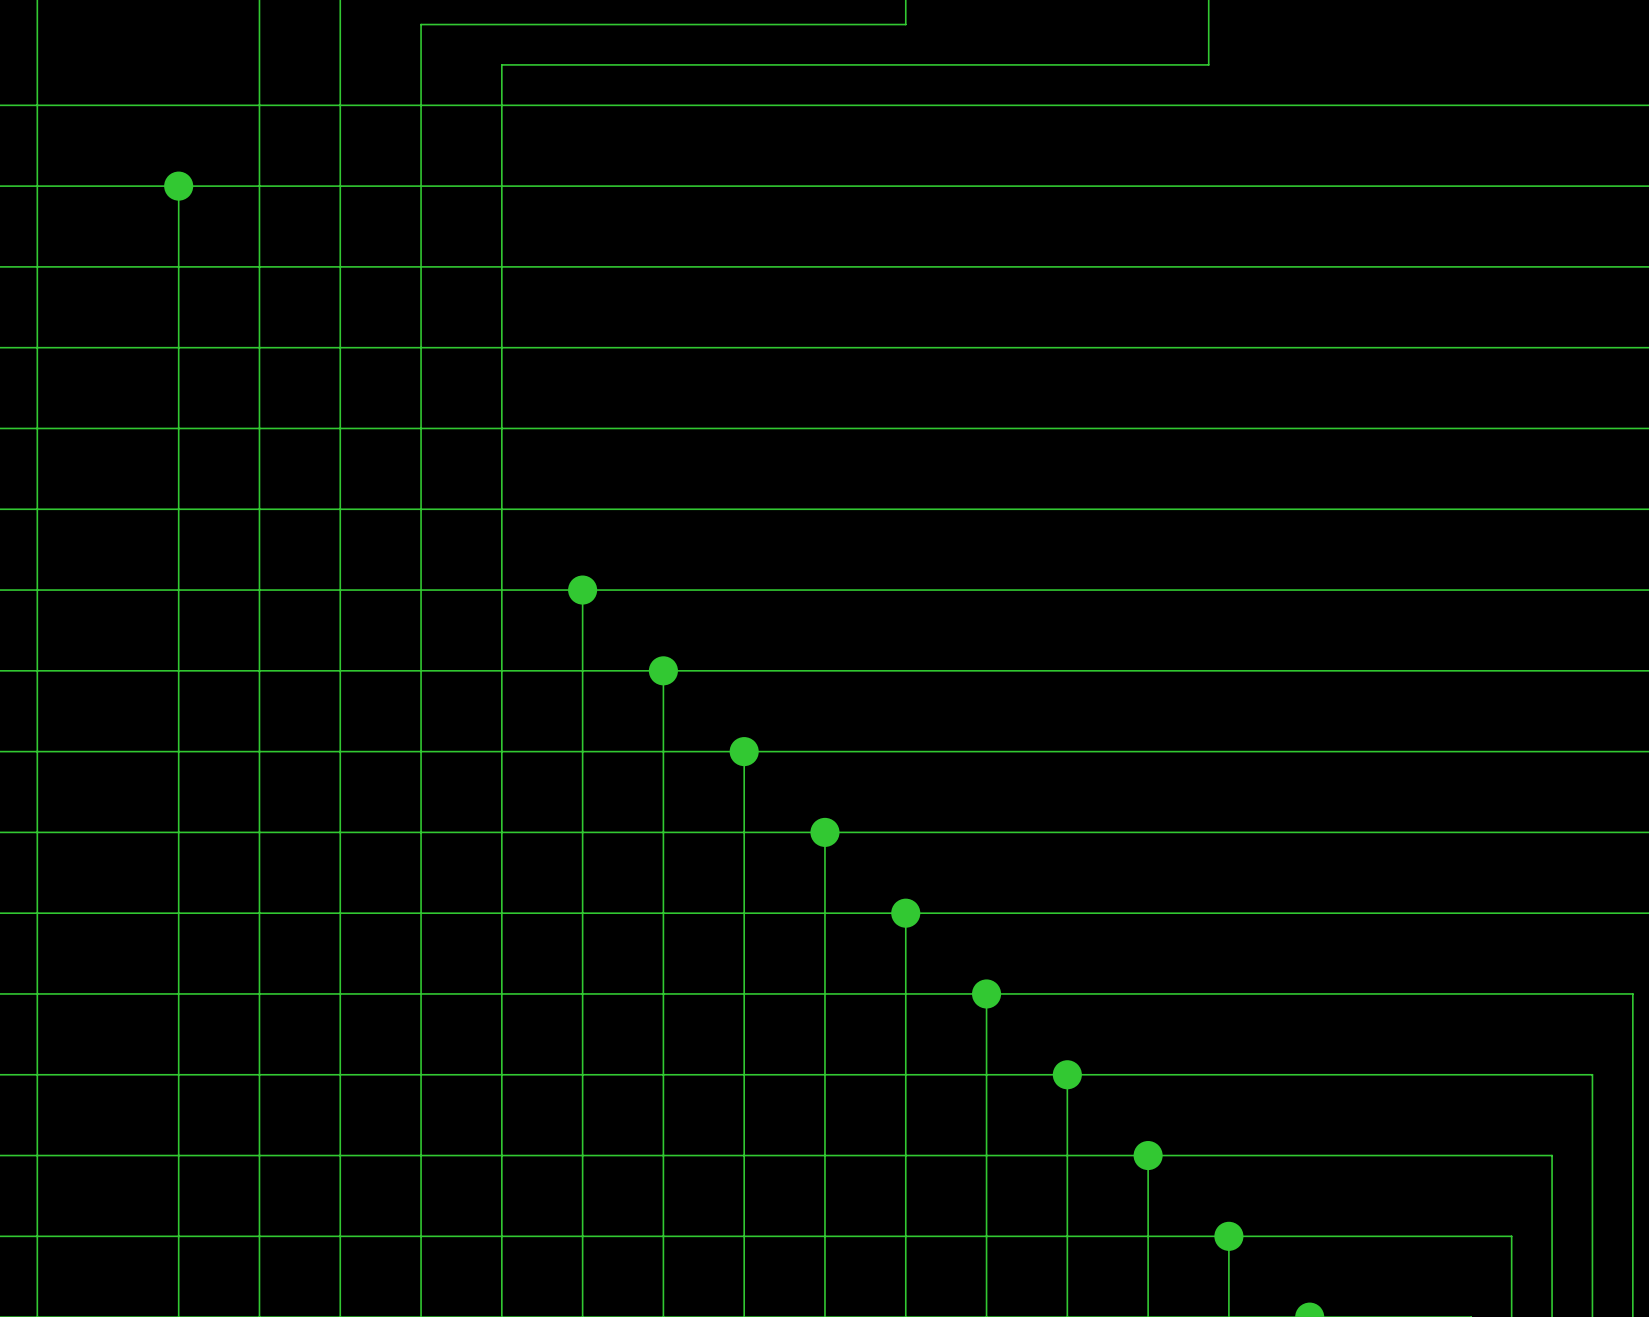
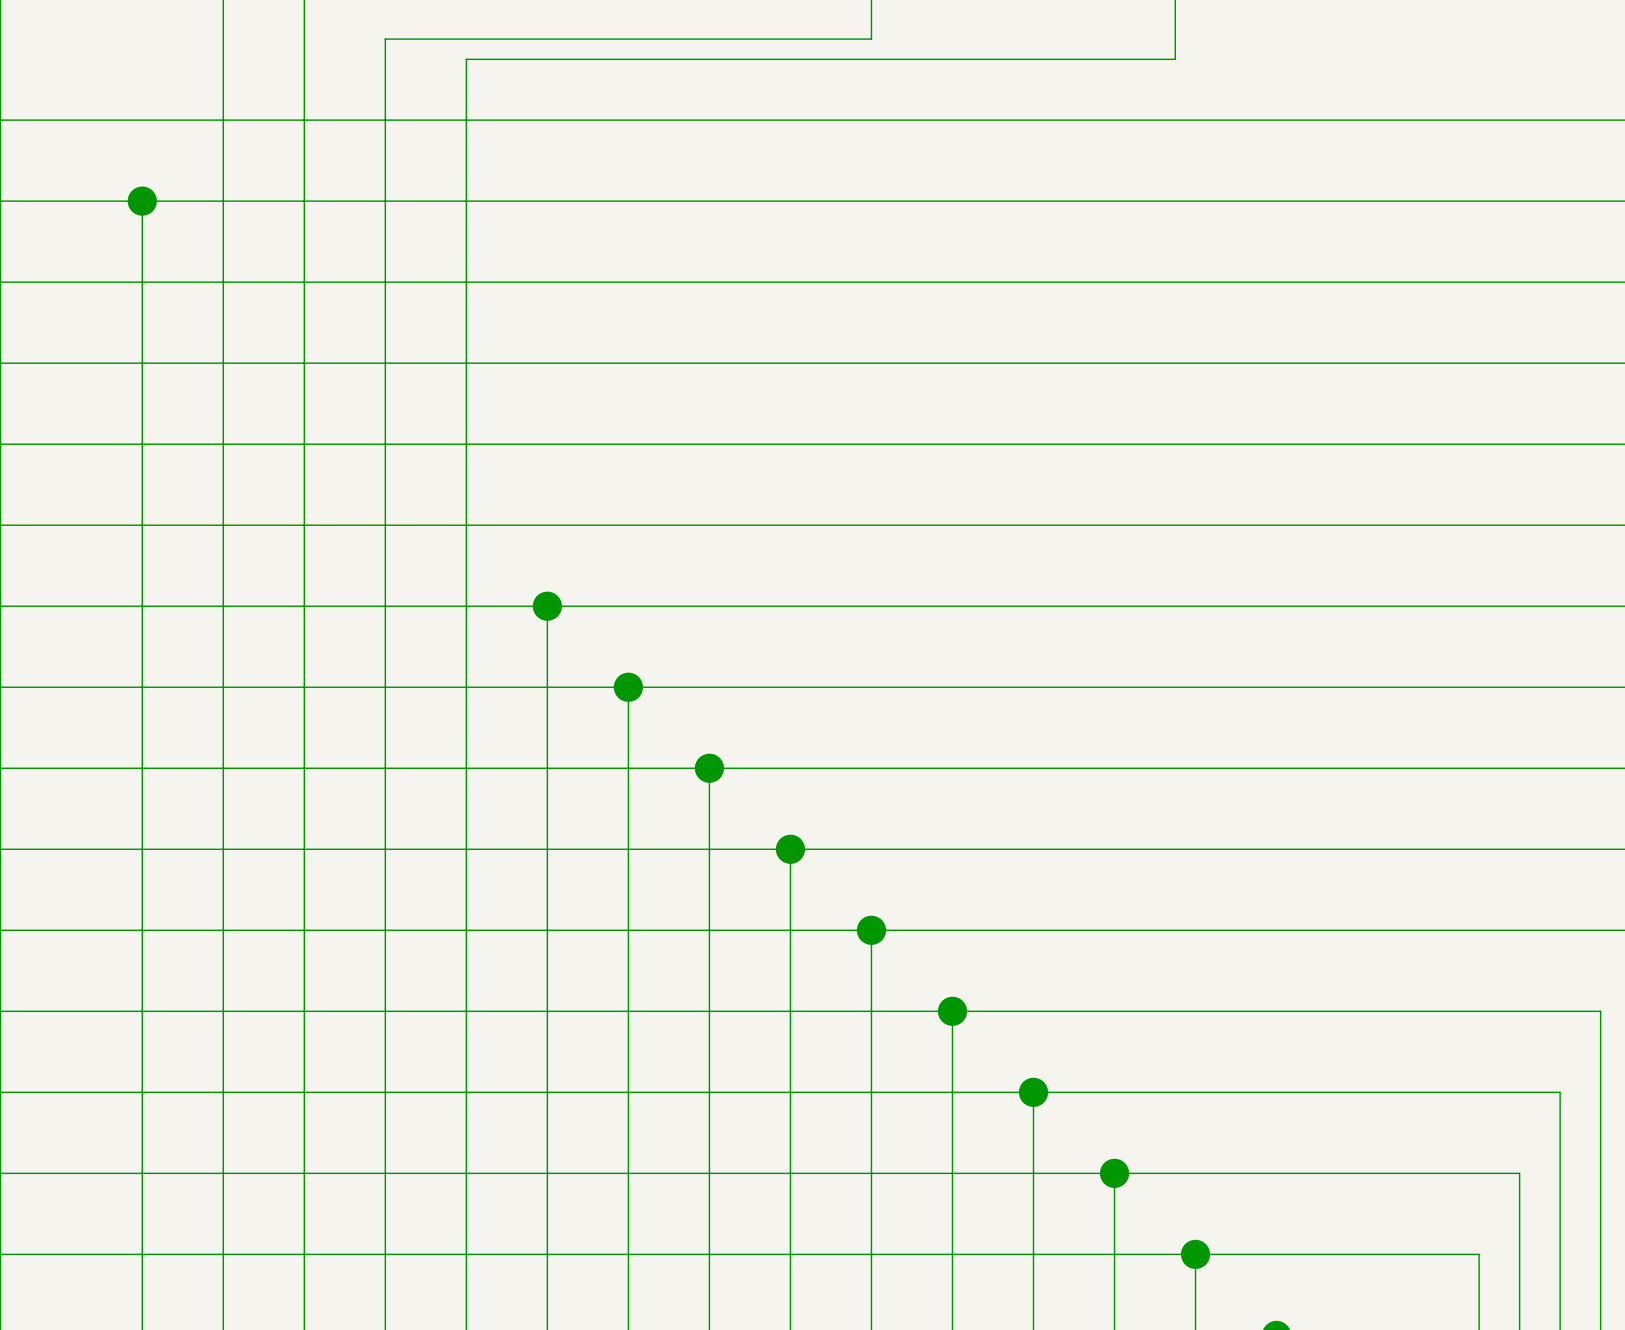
wire: (1208, 44) (1208, 64) (501, 64) -> (1175, 59) (466, 59) (466, 79)

